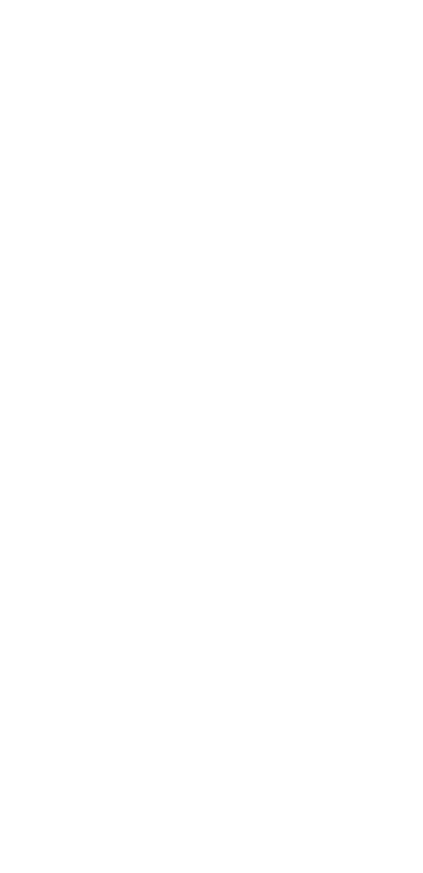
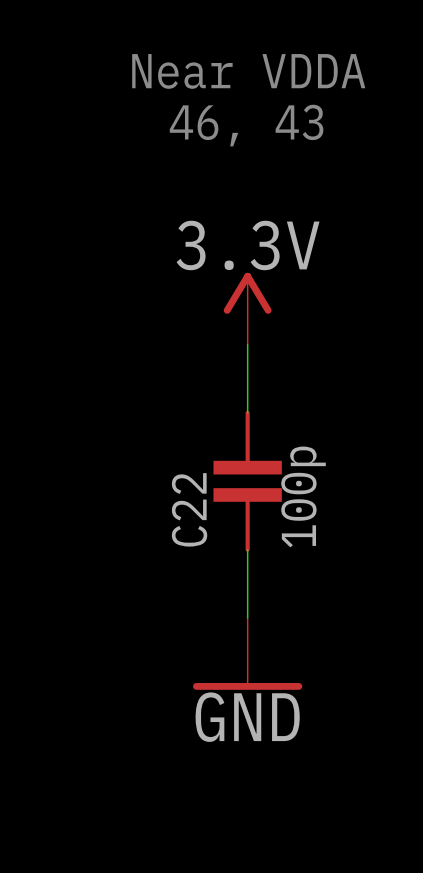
text: none -> Near VDDA (248, 71)
text: none -> 46, 43 (246, 125)
power symbol: none -> 3.3V (247, 308)
wire: none -> (247, 344) (247, 412)
C22: none -> 100p (247, 481)
wire: none -> (247, 549) (247, 618)
power symbol: none -> GND (247, 653)

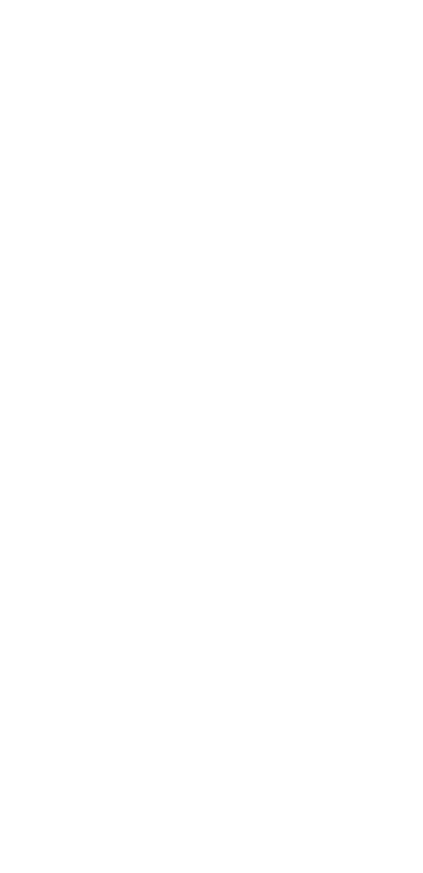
text: Near VDDA (248, 71) -> none
text: 46, 43 (246, 125) -> none
power symbol: 3.3V (247, 308) -> none
wire: (247, 344) (247, 412) -> none
C22: 100p (247, 481) -> none
wire: (247, 549) (247, 618) -> none
power symbol: GND (247, 653) -> none

